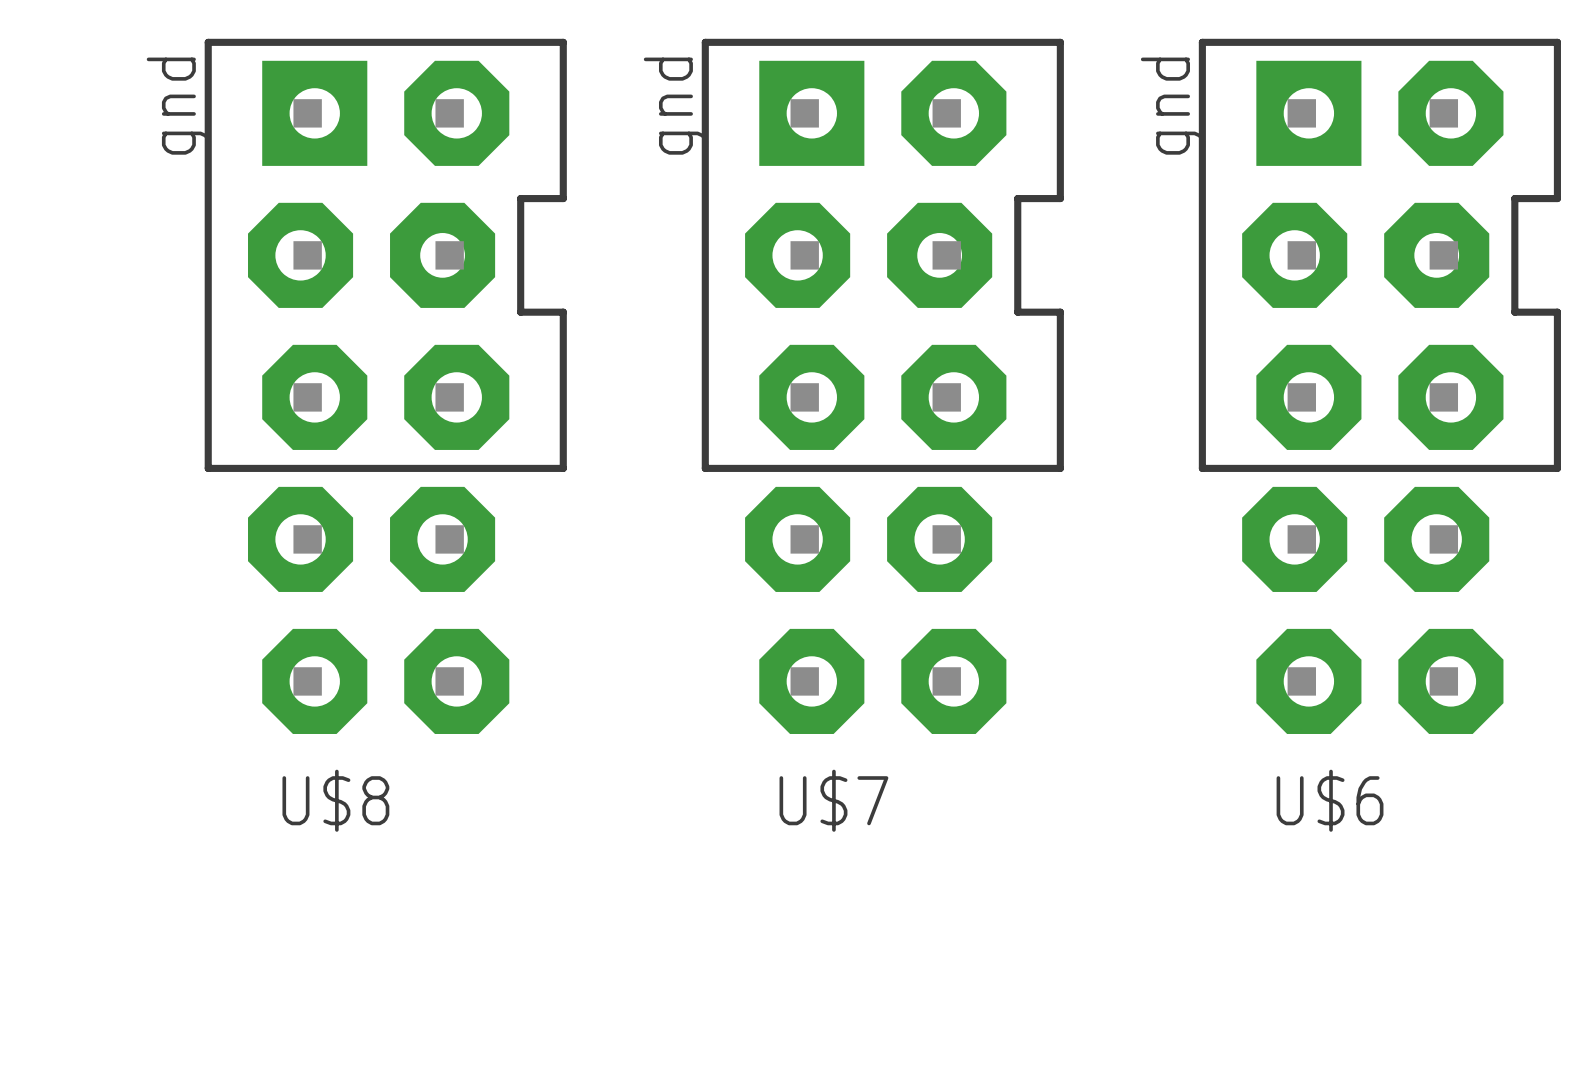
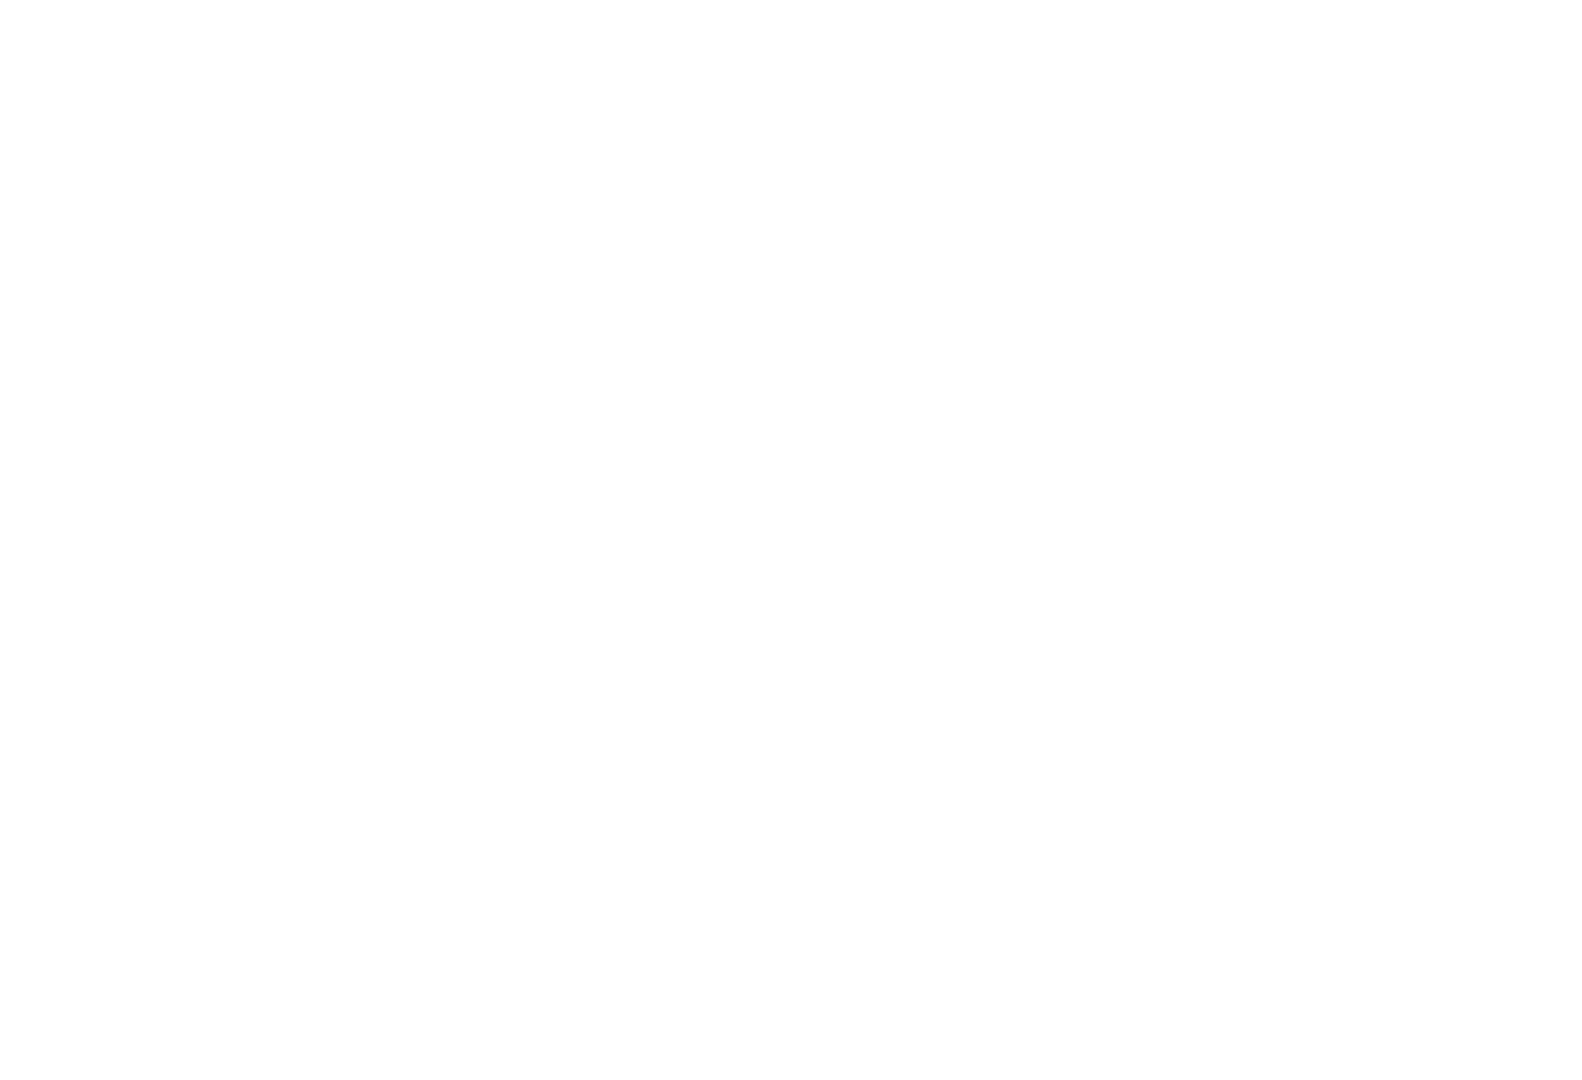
U$8: (385, 386) -> none
U$7: (882, 386) -> none
U$6: (1379, 386) -> none

